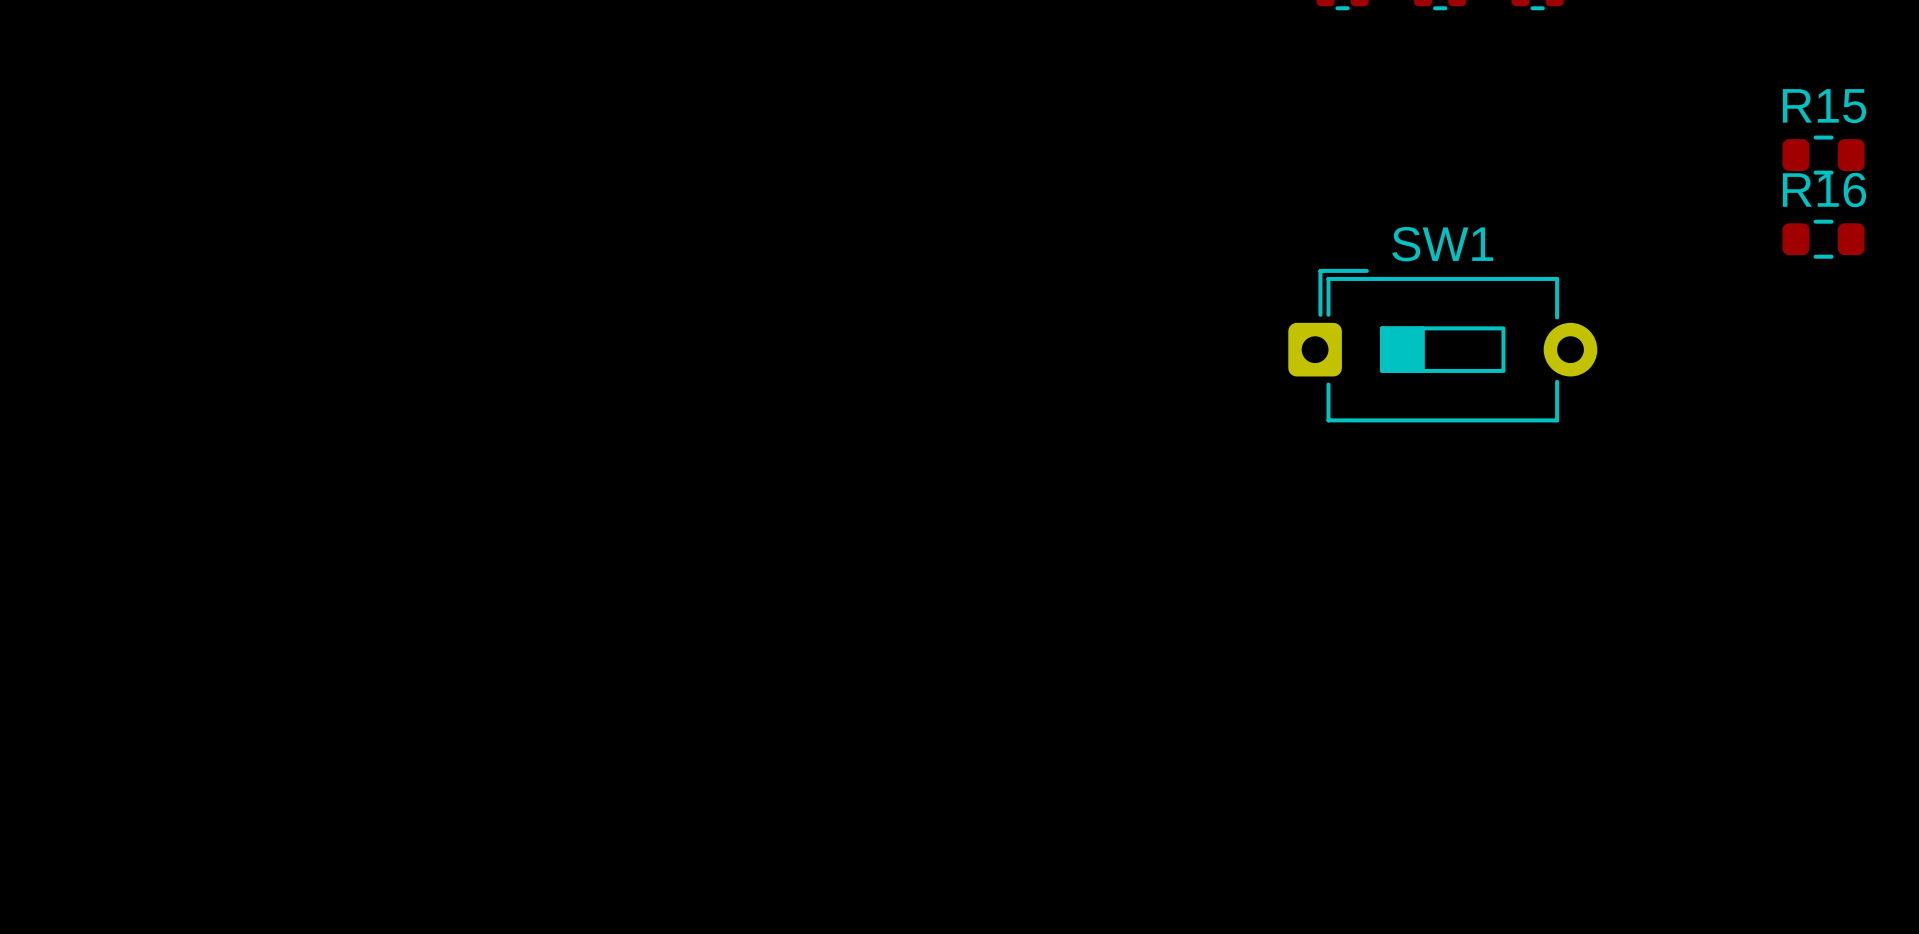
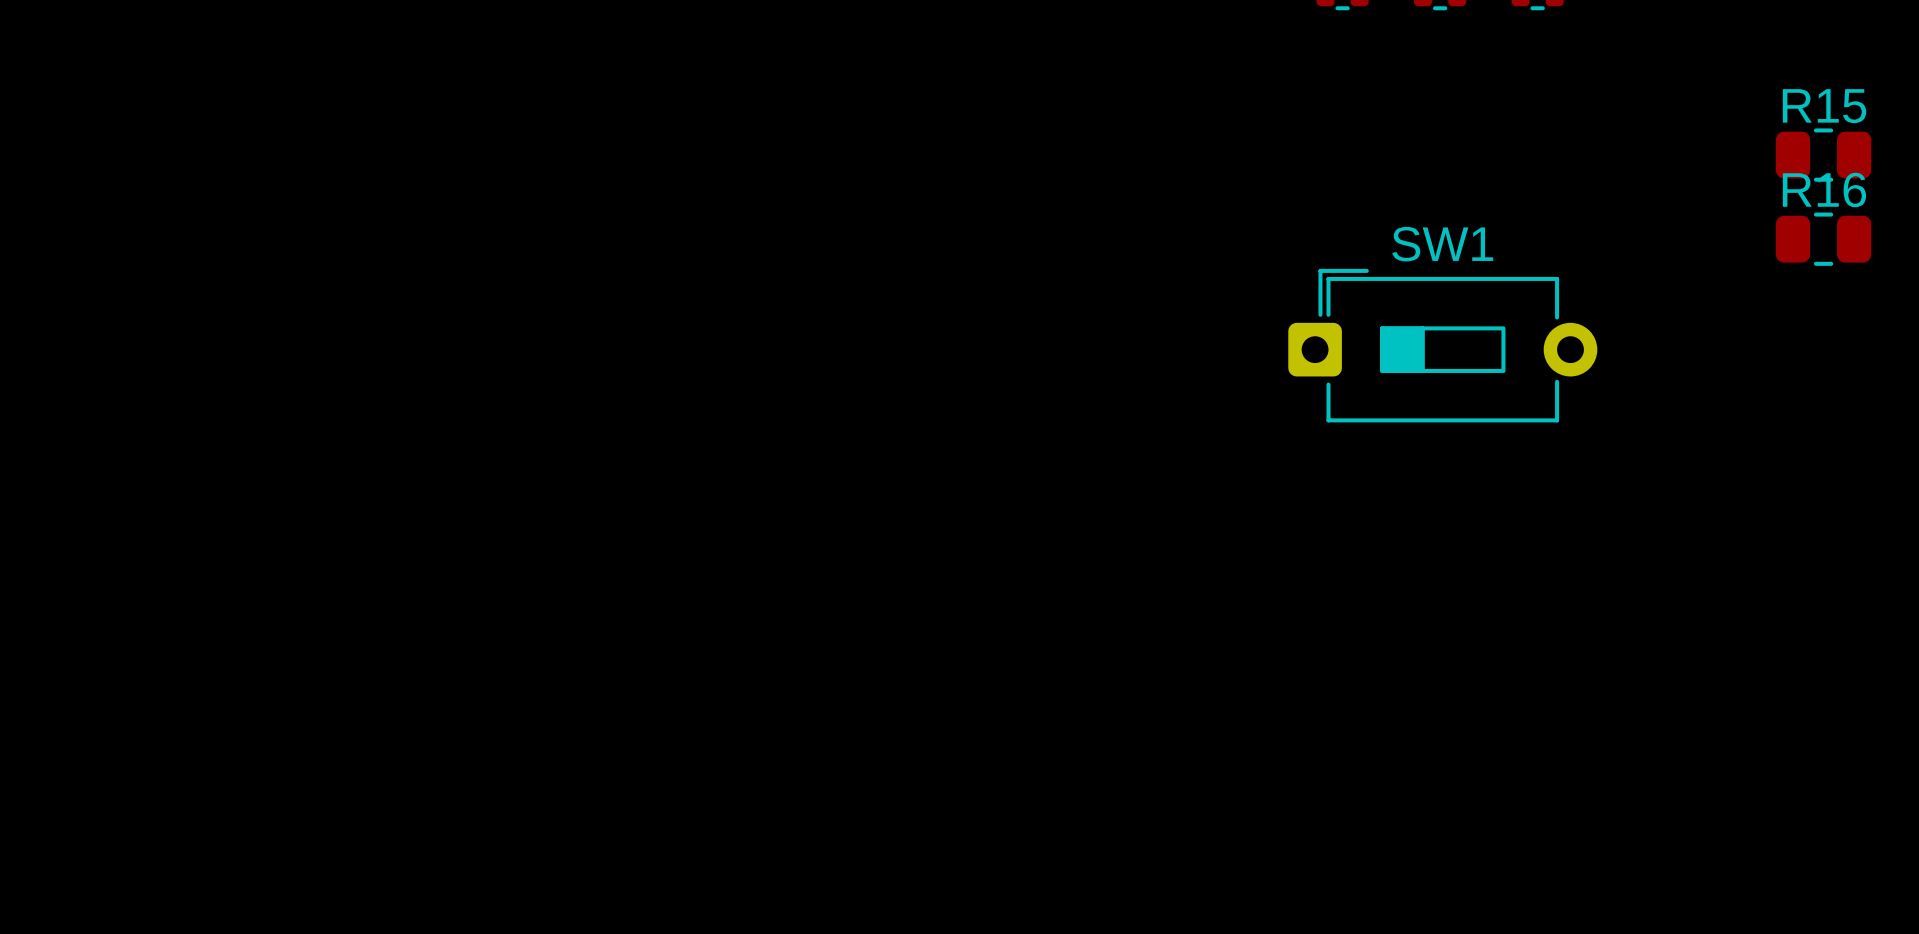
R15 footprint: [1782, 135, 1865, 175] -> [1775, 128, 1872, 182]
R16 footprint: [1782, 219, 1865, 259] -> [1775, 212, 1872, 266]

